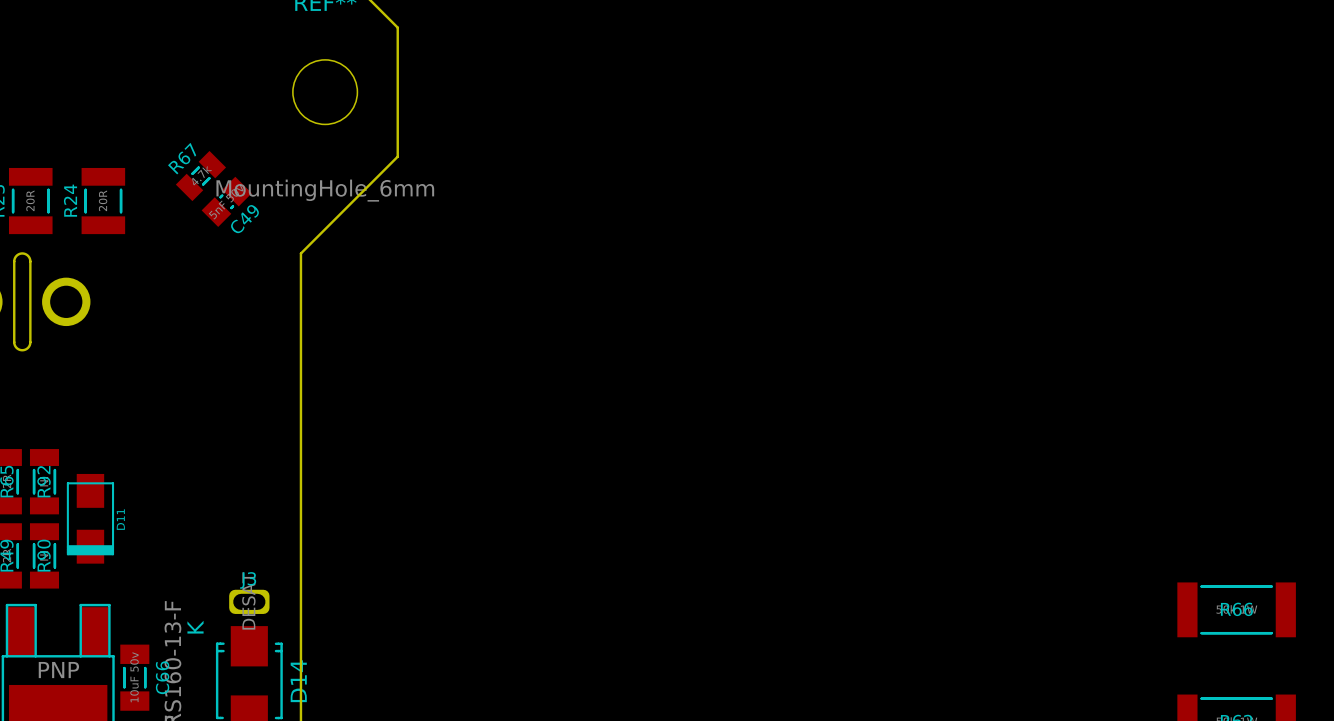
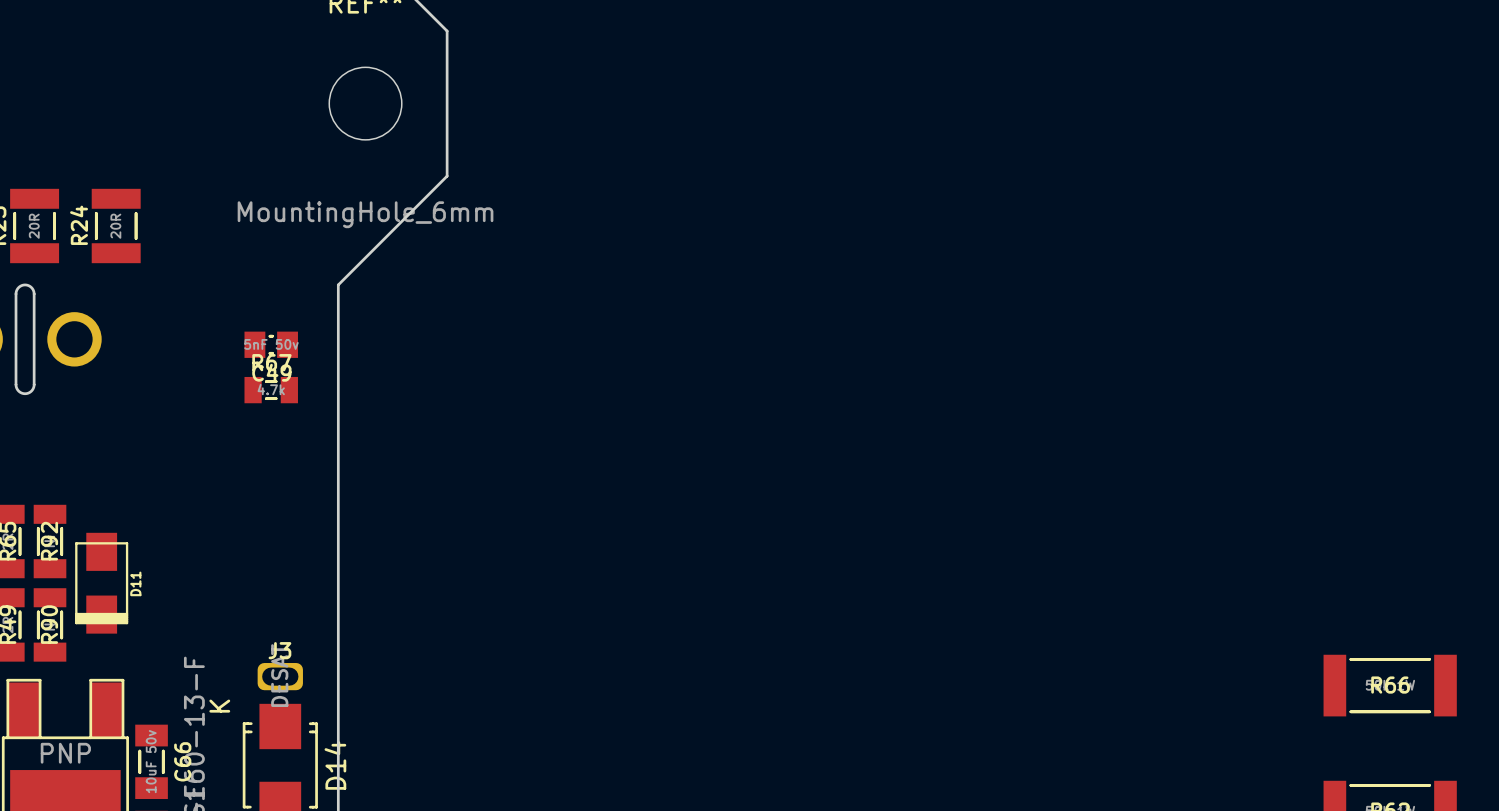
R67 rotation: 0° (200, 176) -> 45° clockwise (271, 390)
R67 position: (200, 176) -> (271, 390)
C49 rotation: 0° (226, 201) -> 45° clockwise (271, 344)
C49 position: (226, 201) -> (271, 344)

